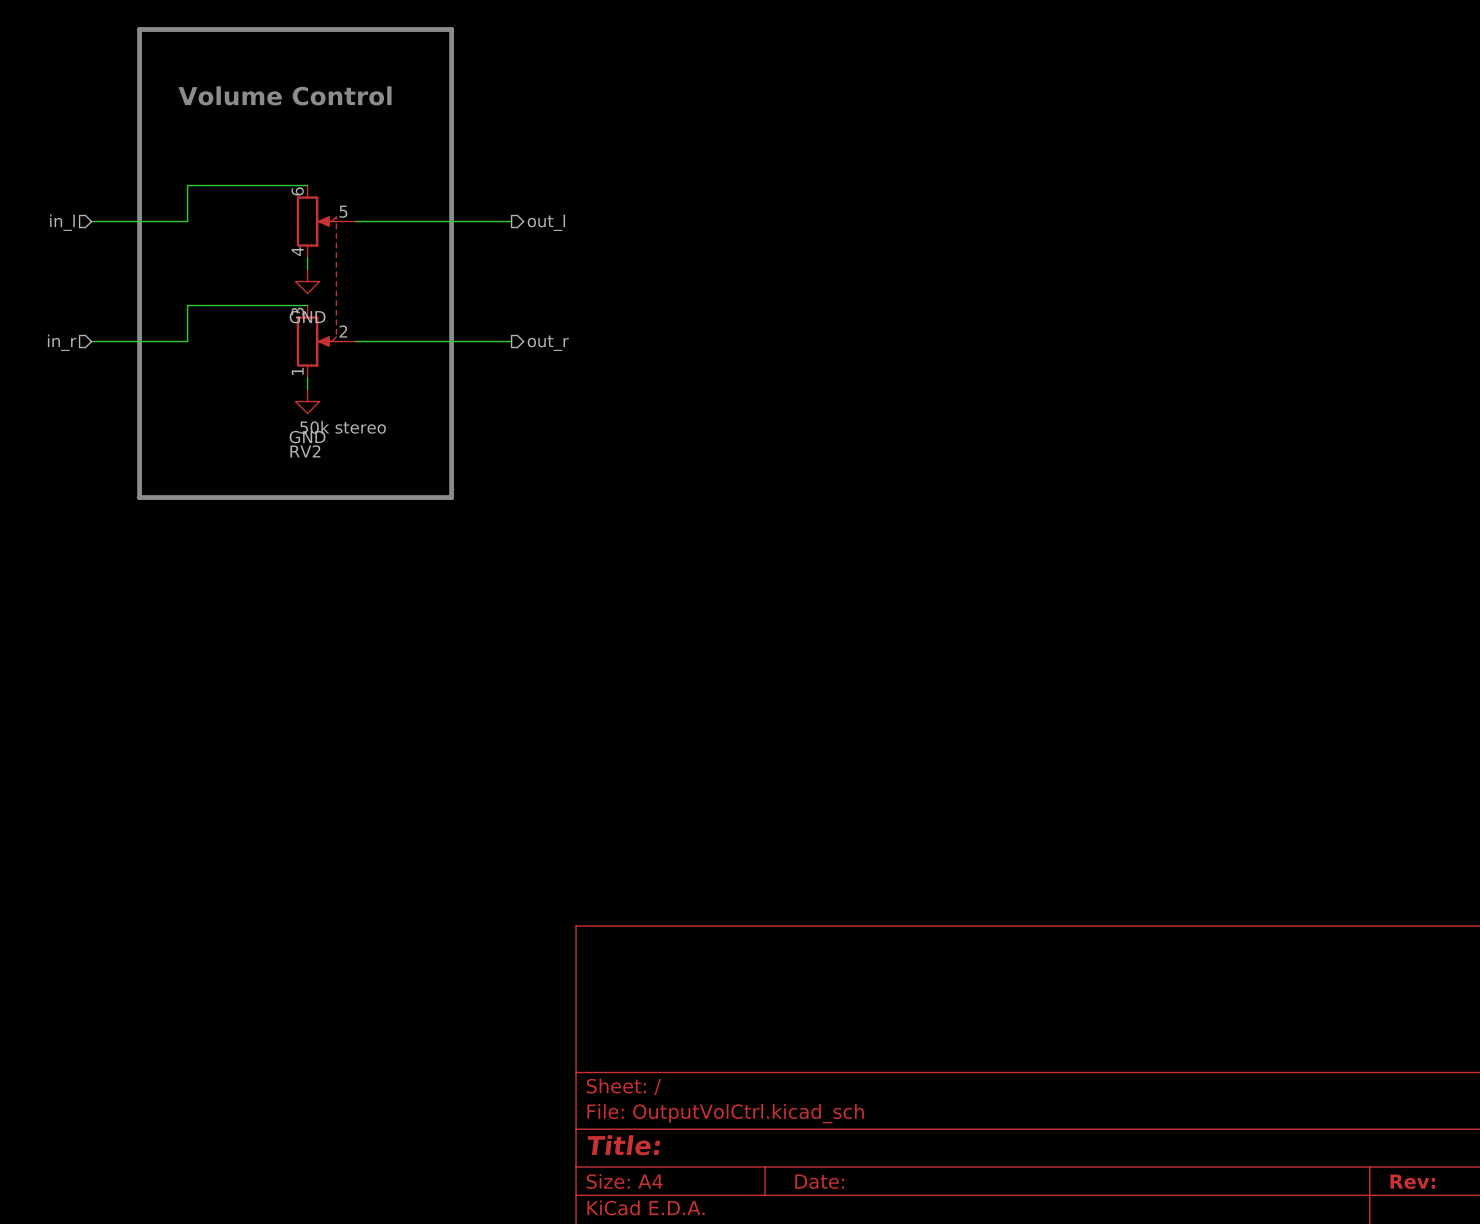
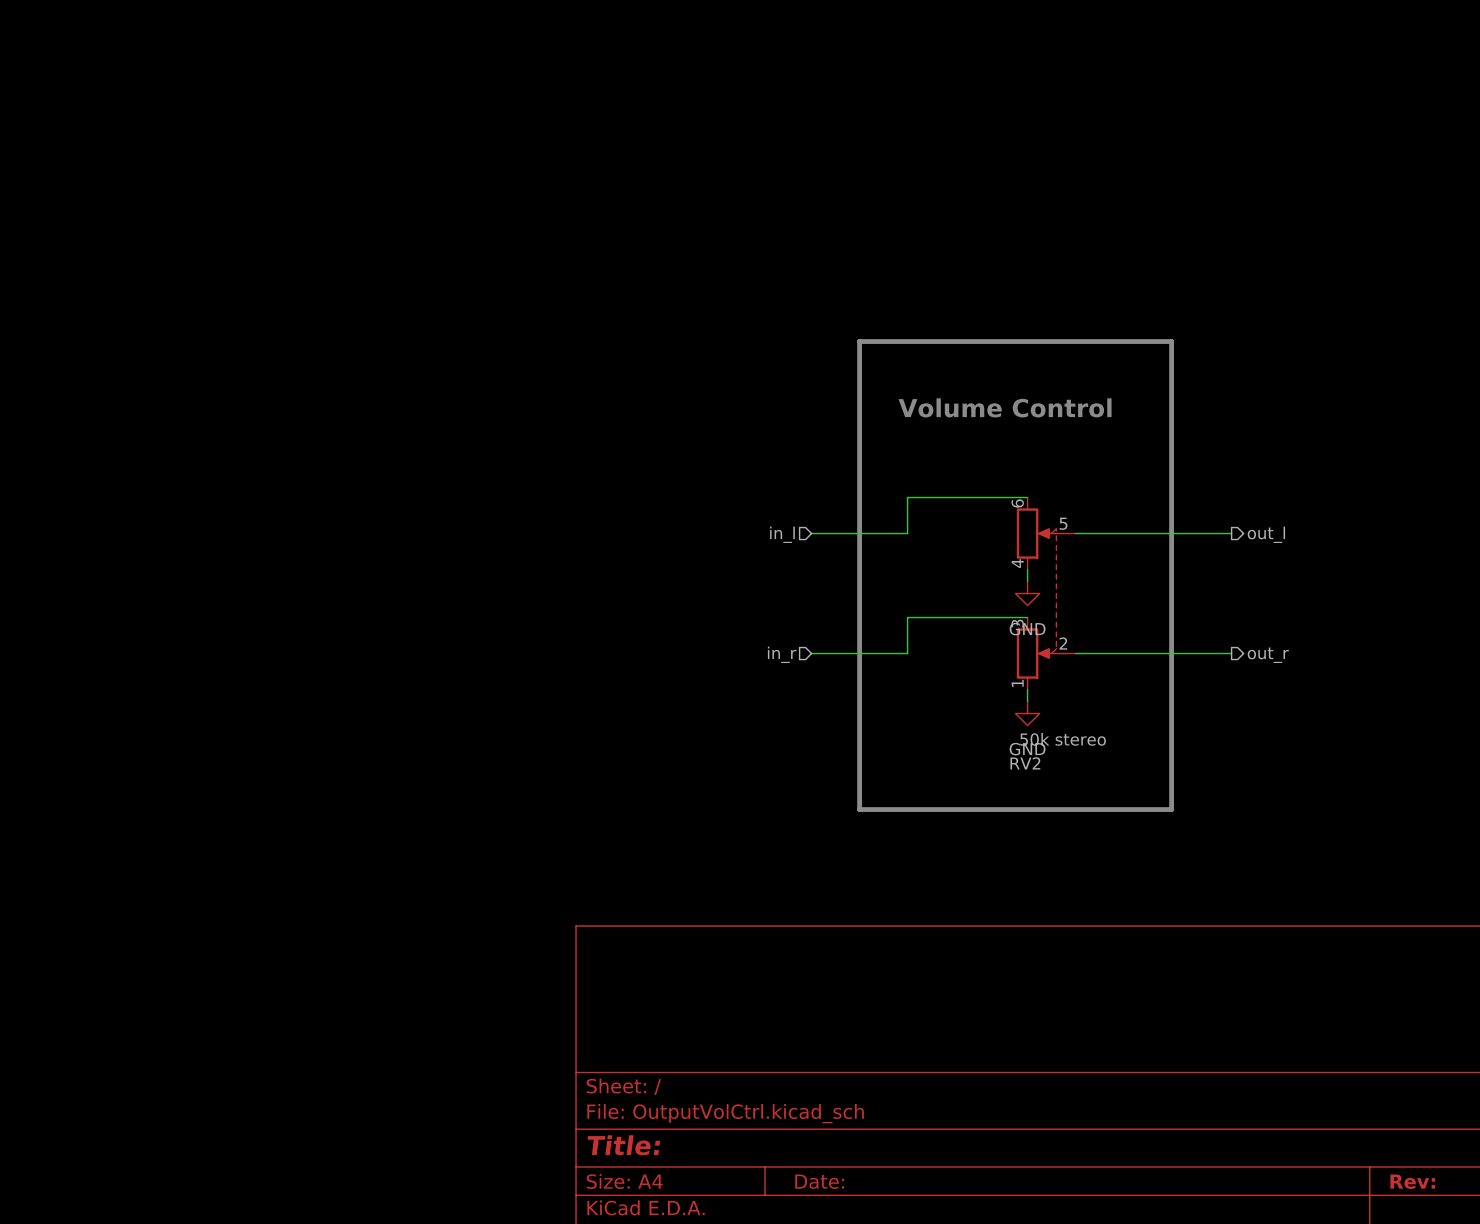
line: (139, 29) (451, 29) (451, 497) (139, 497) (139, 29) -> none
text: Volume Control (284, 95) -> none
wire: (307, 185) (187, 185) (187, 221) (91, 221) -> none
wire: (355, 221) (511, 221) -> none
hierarchical label: in_l (62, 222) -> none
hierarchical label: out_l (546, 222) -> none
wire: (307, 257) (307, 269) -> none
power symbol: GND (307, 281) -> none
RV2 position: (326, 281) -> (1046, 593)
wire: (307, 305) (187, 305) (187, 341) (91, 341) -> none
wire: (355, 341) (511, 341) -> none
line: none -> (859, 341) (1171, 341) (1171, 809) (859, 809) (859, 341)
hierarchical label: in_r (62, 342) -> none
hierarchical label: out_r (548, 343) -> none
wire: (307, 377) (307, 389) -> none
power symbol: GND (307, 401) -> none
text: none -> Volume Control (1005, 407)
wire: none -> (1027, 497) (907, 497) (907, 533) (811, 533)
wire: none -> (1075, 533) (1231, 533)
hierarchical label: none -> in_l (782, 534)
hierarchical label: none -> out_l (1266, 534)
wire: none -> (1027, 569) (1027, 581)
power symbol: none -> GND (1027, 593)
wire: none -> (1027, 617) (907, 617) (907, 653) (811, 653)
wire: none -> (1075, 653) (1231, 653)
hierarchical label: none -> in_r (782, 654)
hierarchical label: none -> out_r (1268, 655)
wire: none -> (1027, 689) (1027, 701)
power symbol: none -> GND (1027, 713)

